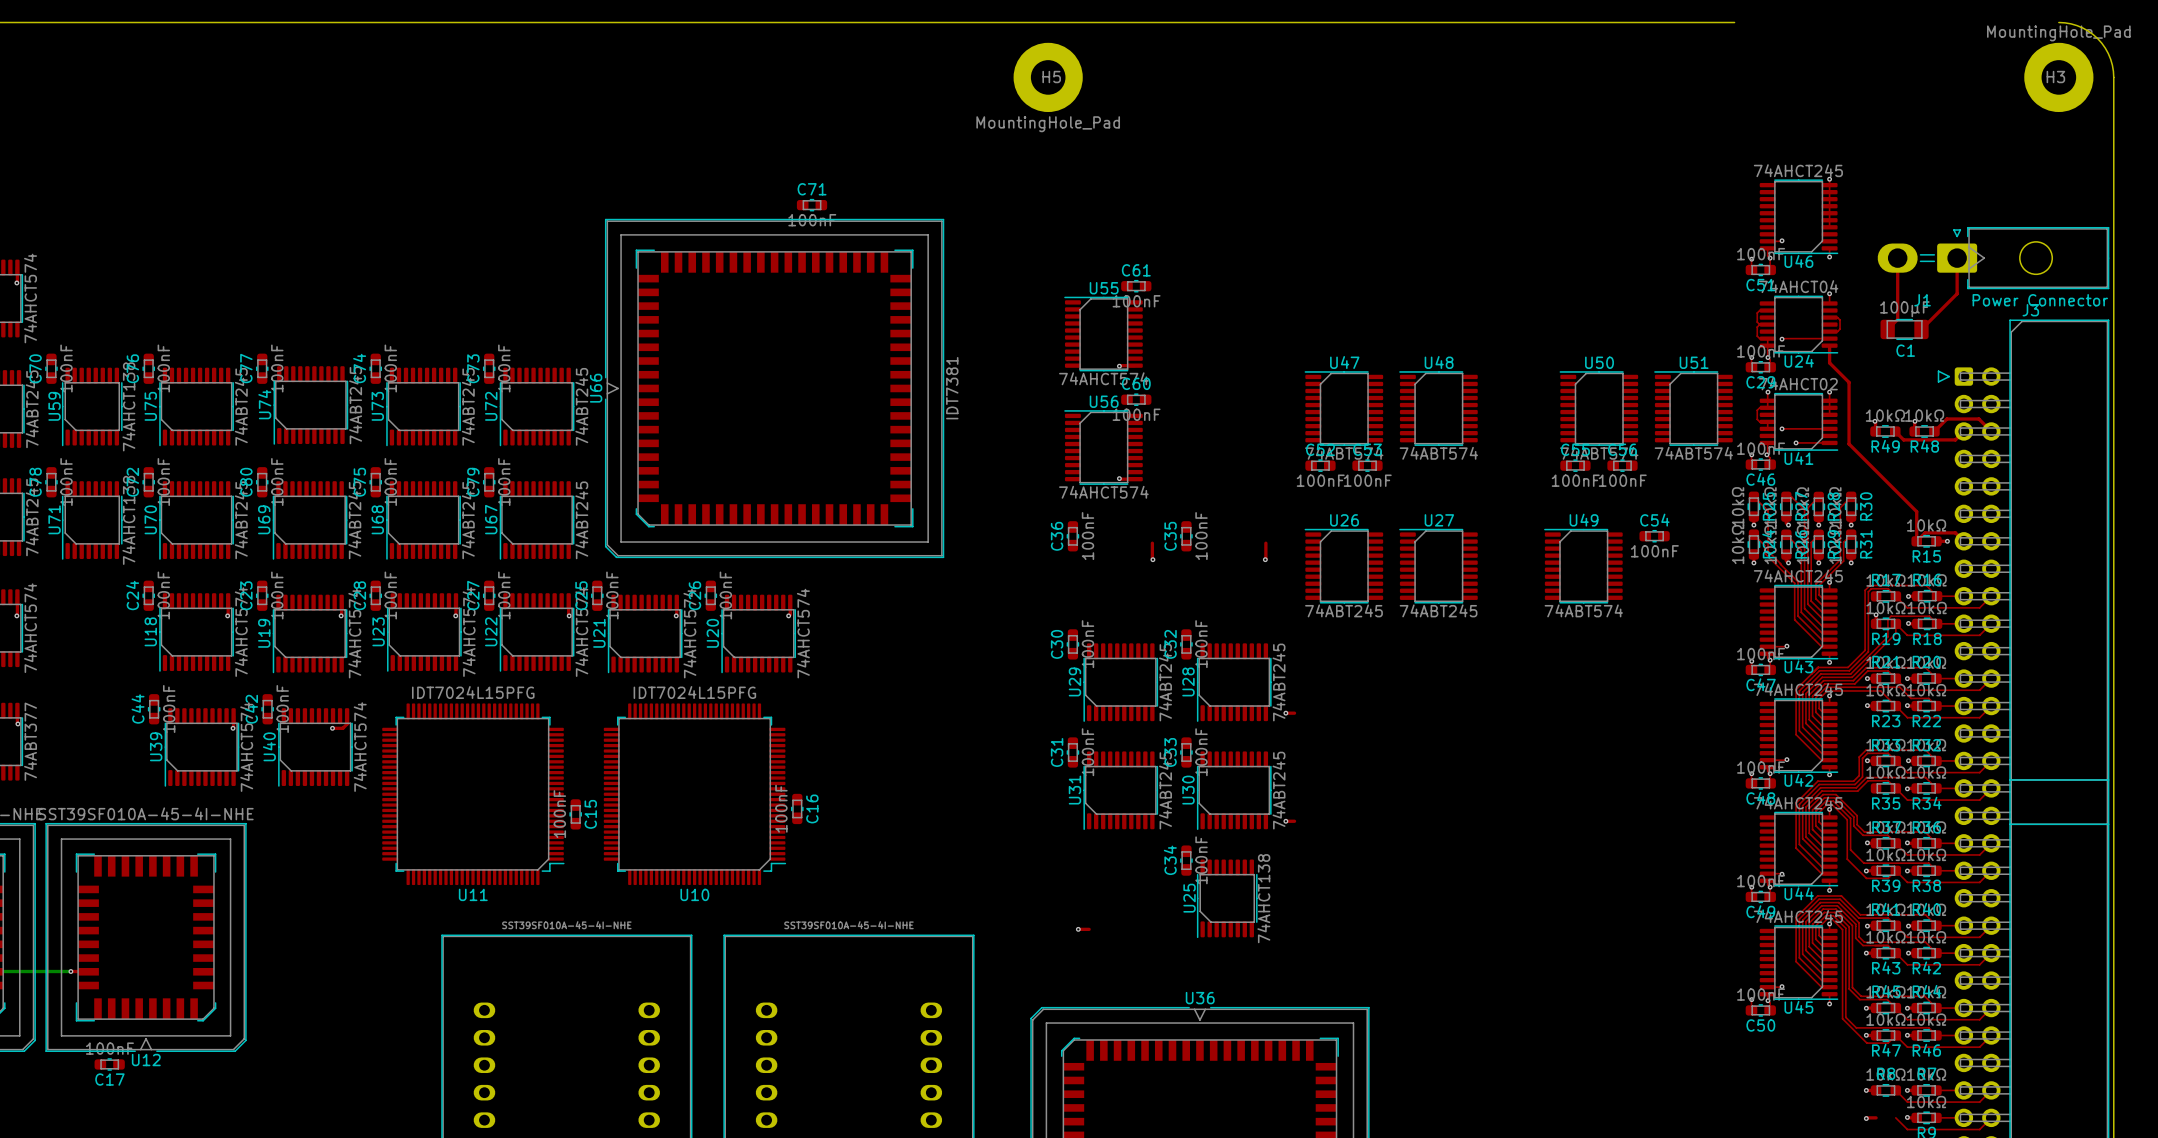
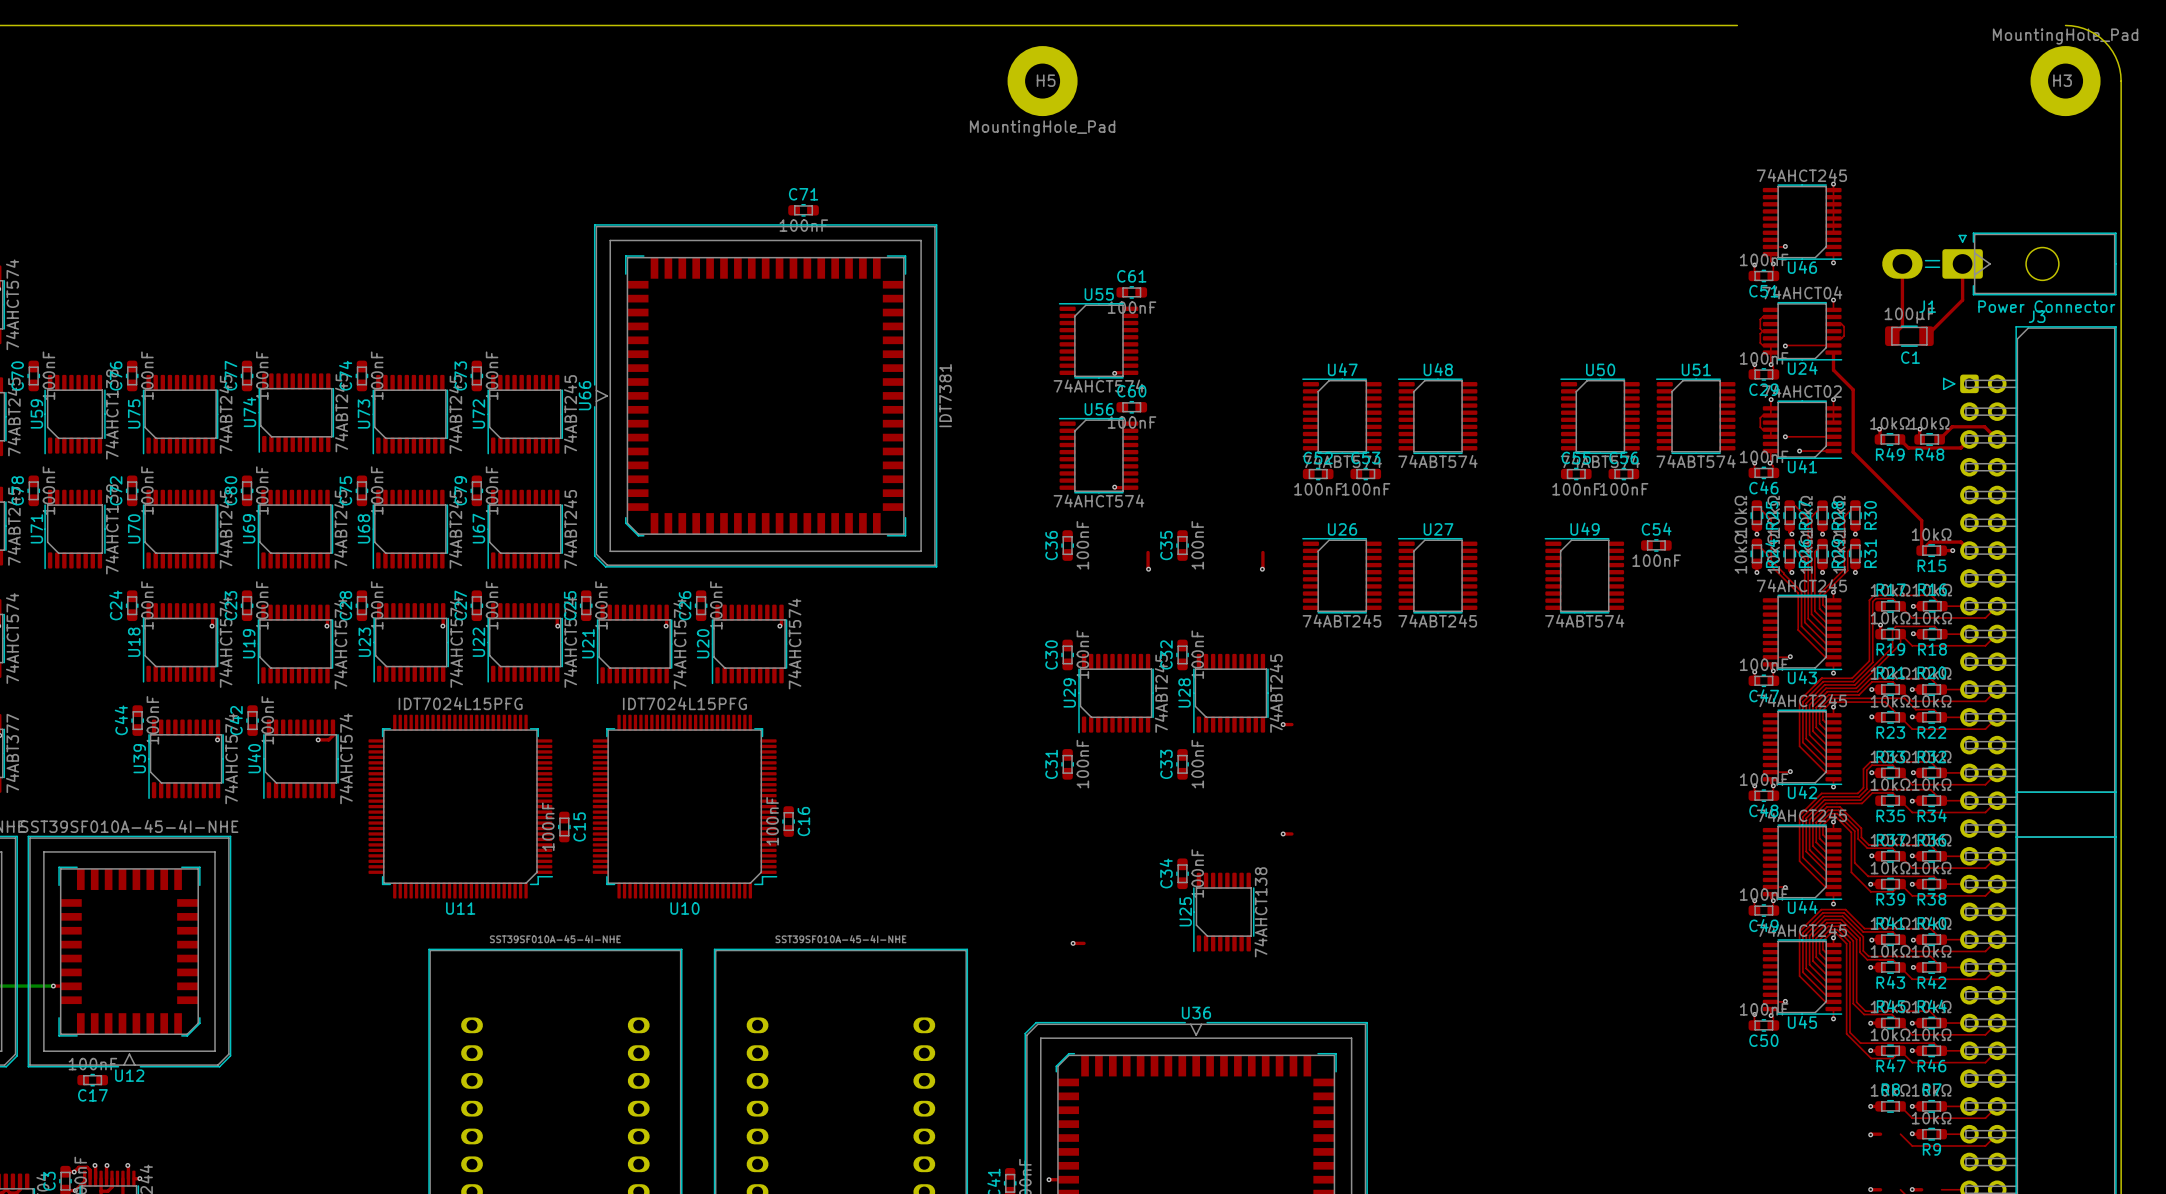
U31: 74ABT245 (1120, 790) -> none
U30: 74ABT245 (1234, 790) -> none

